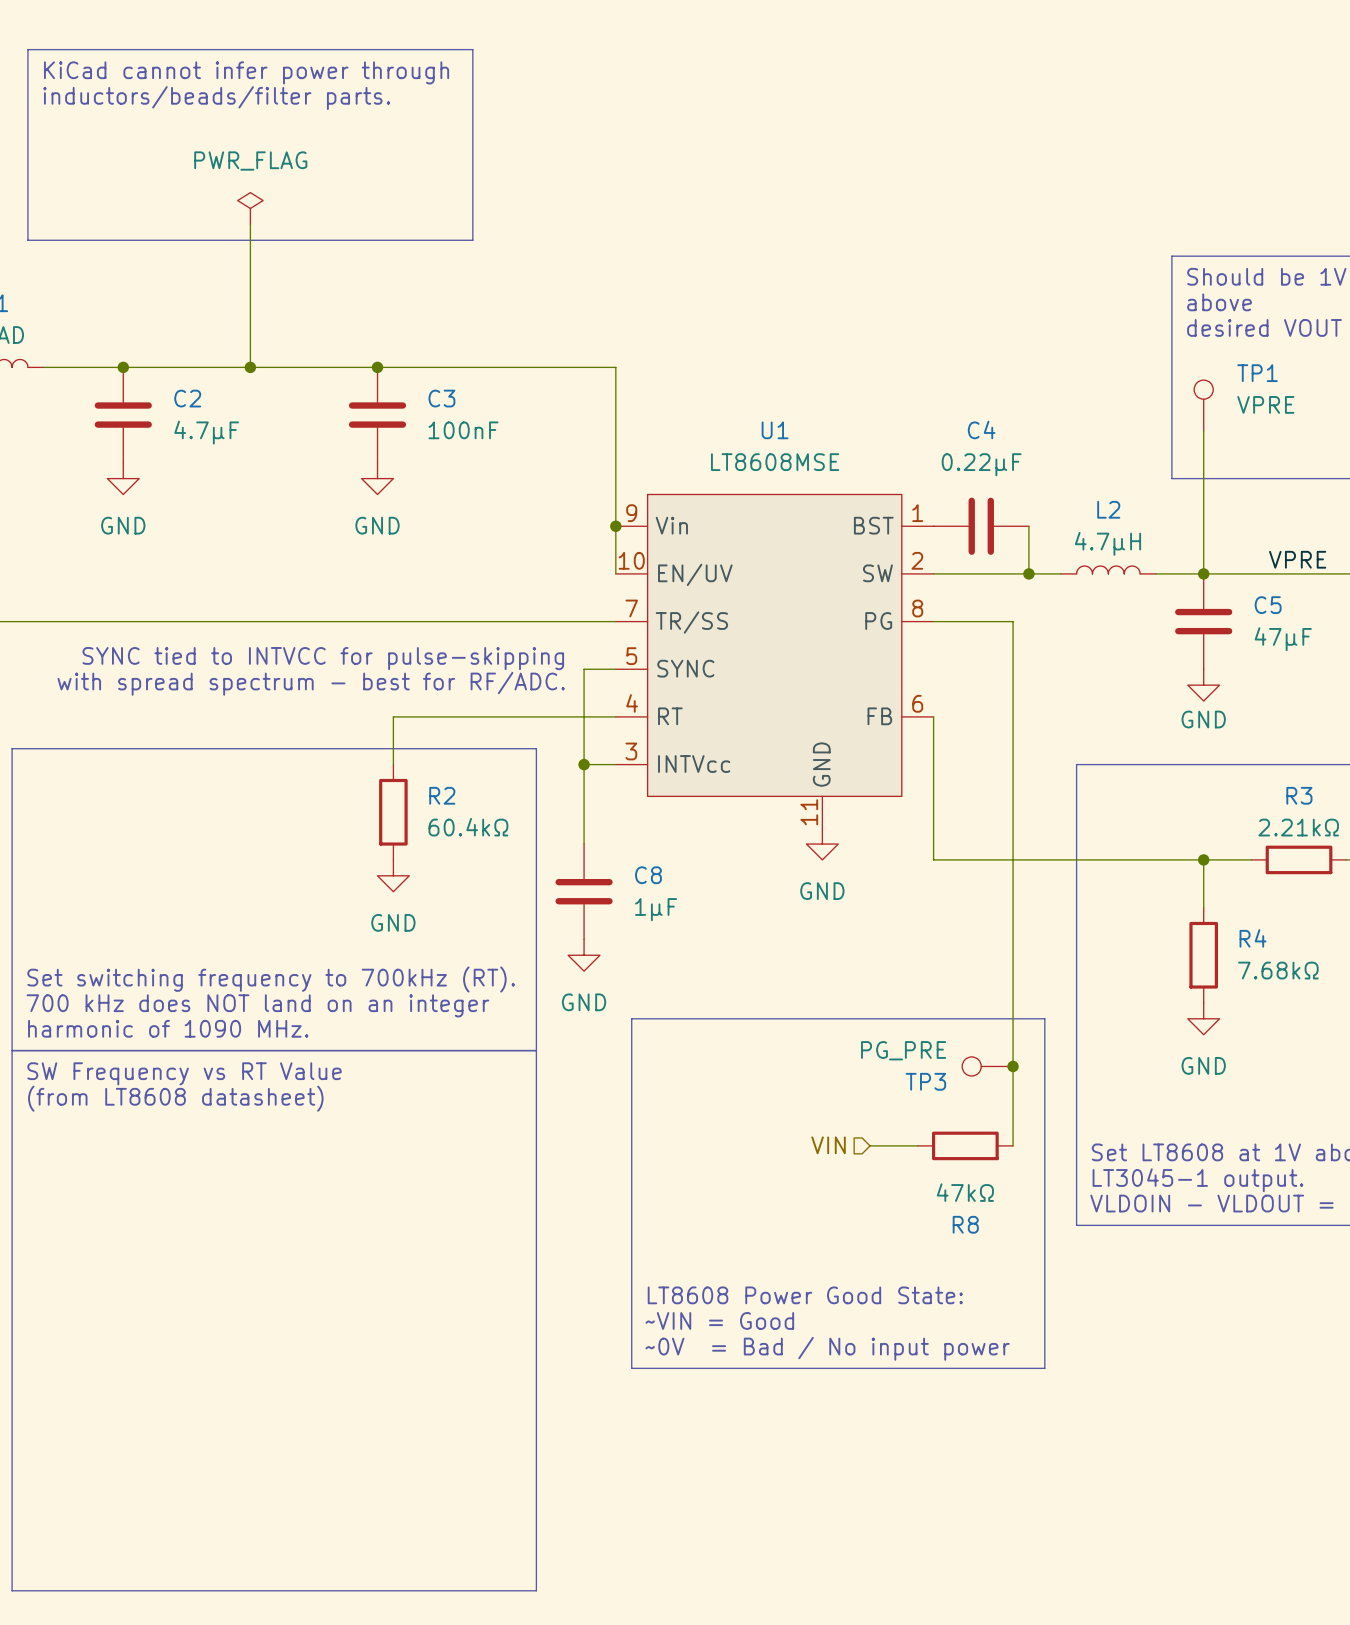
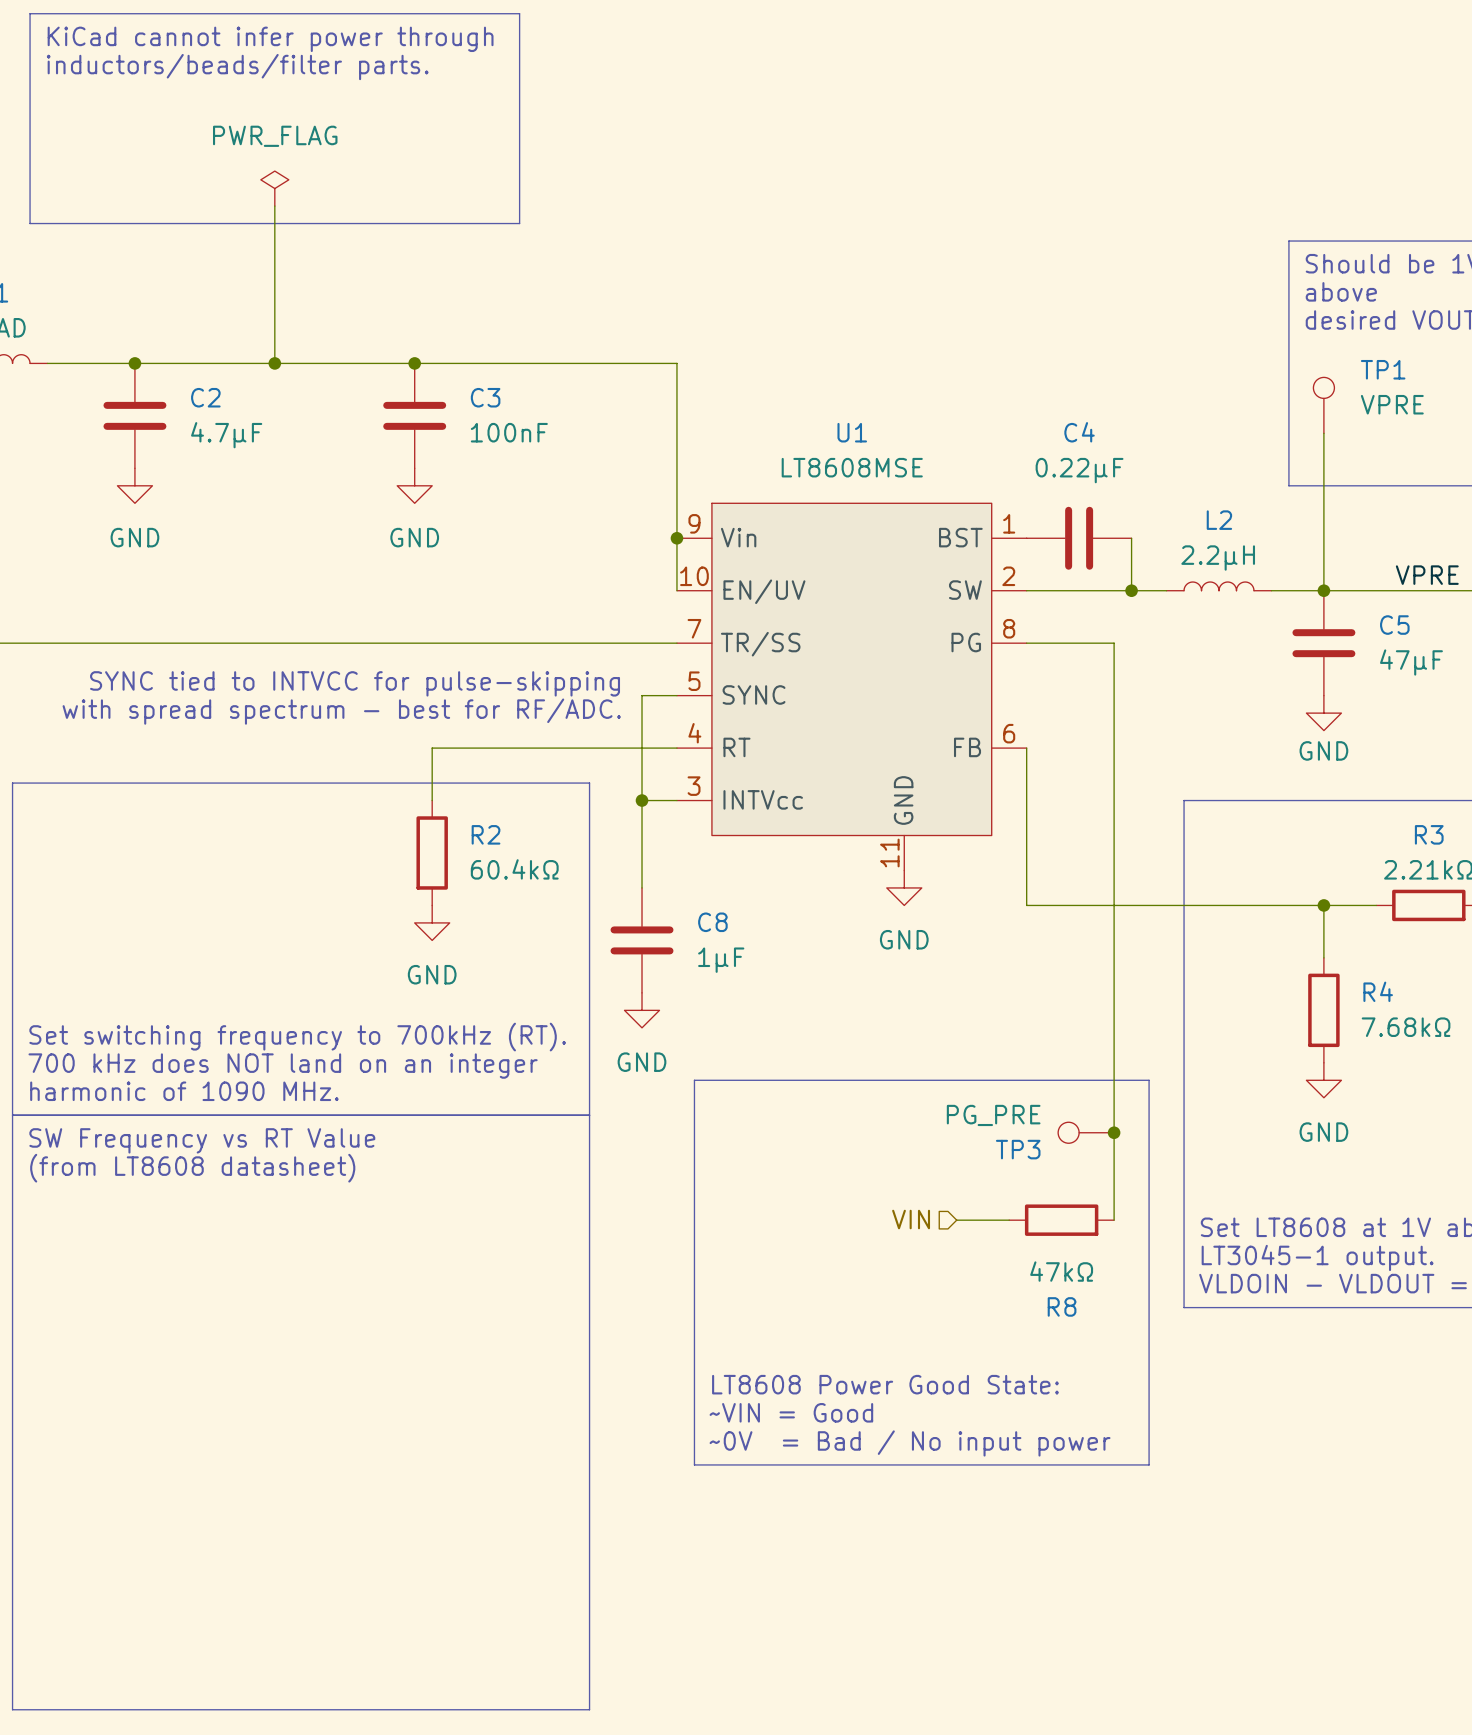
L2 value: 4.7µH (1107, 543) -> 2.2µH (1218, 558)

